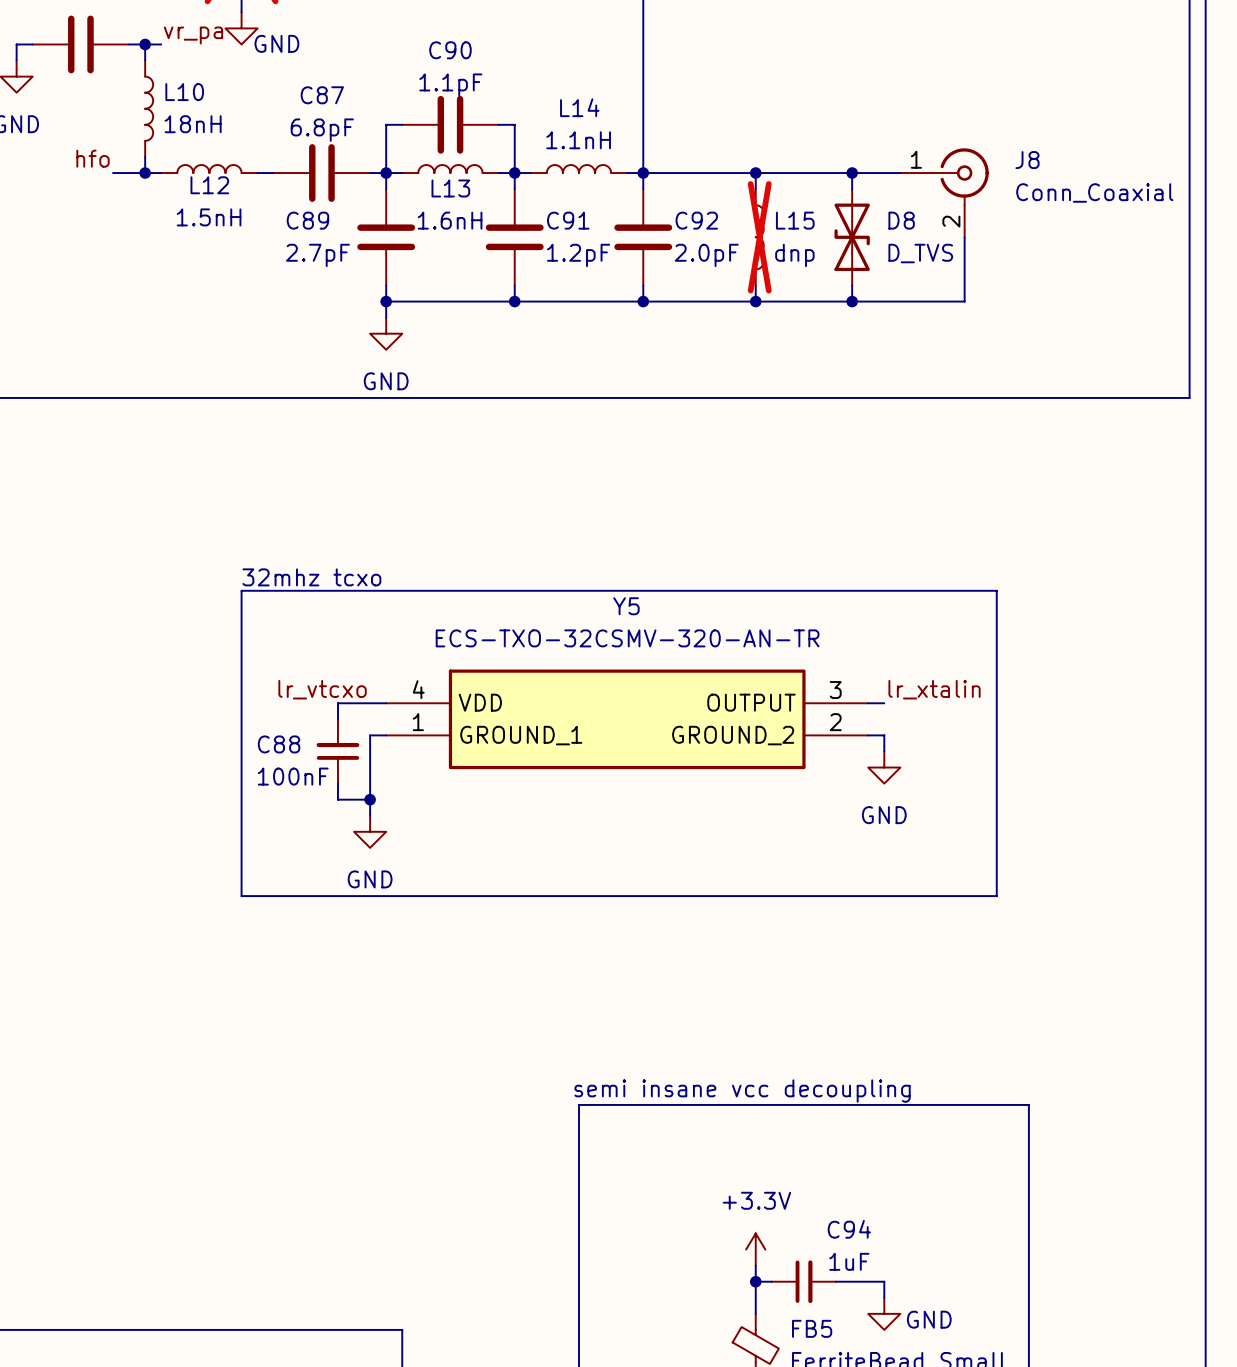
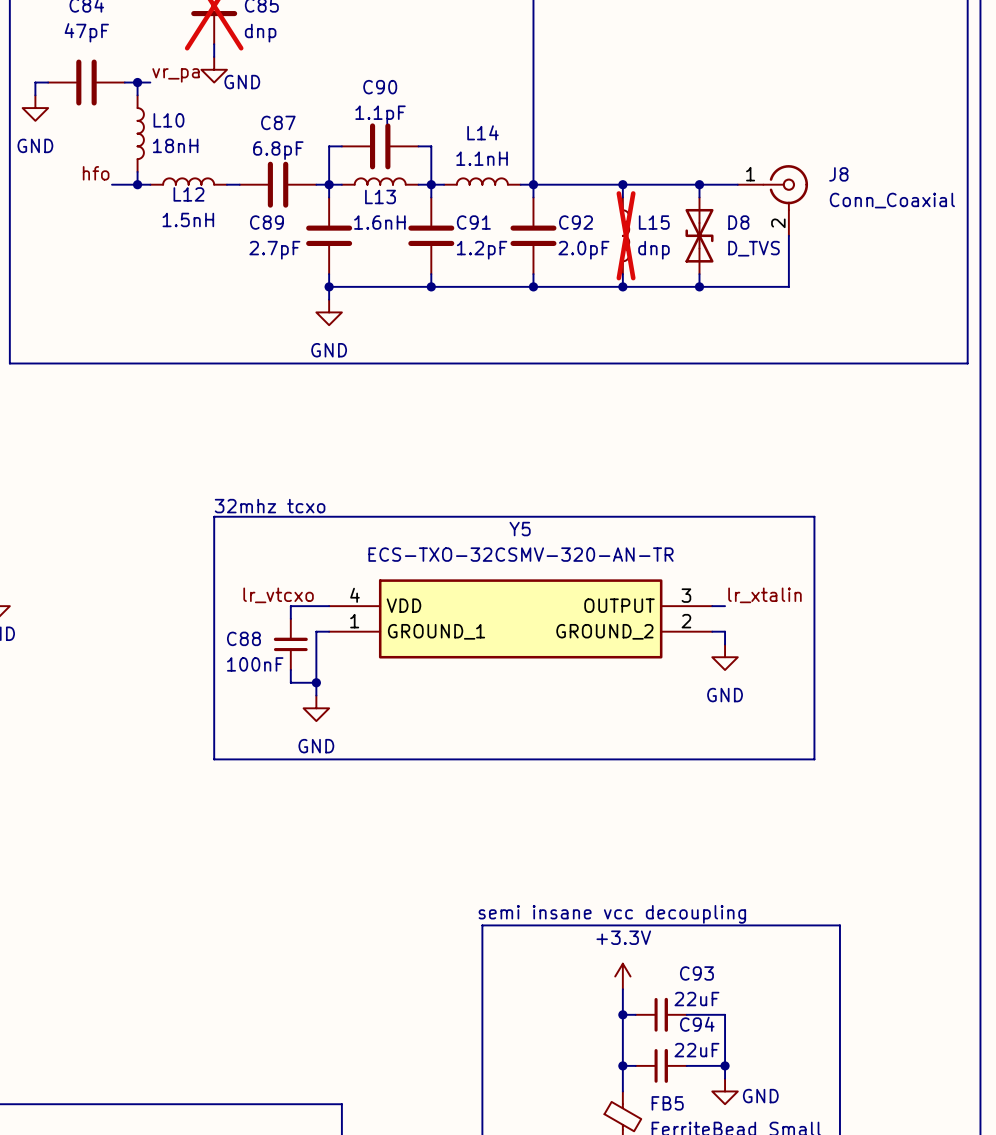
wire: none -> (622, 989) (622, 1053)
wire: none -> (622, 1014) (635, 1014)
junction: none -> (622, 1014)
C93: none -> 22uF (661, 1014)
wire: none -> (686, 1014) (725, 1014) (725, 1065)
power symbol position: +3.3V (755, 1249) -> +3.3V (622, 976)
C94 value: 1uF (849, 1261) -> 22uF (696, 1050)
junction: none -> (725, 1065)

